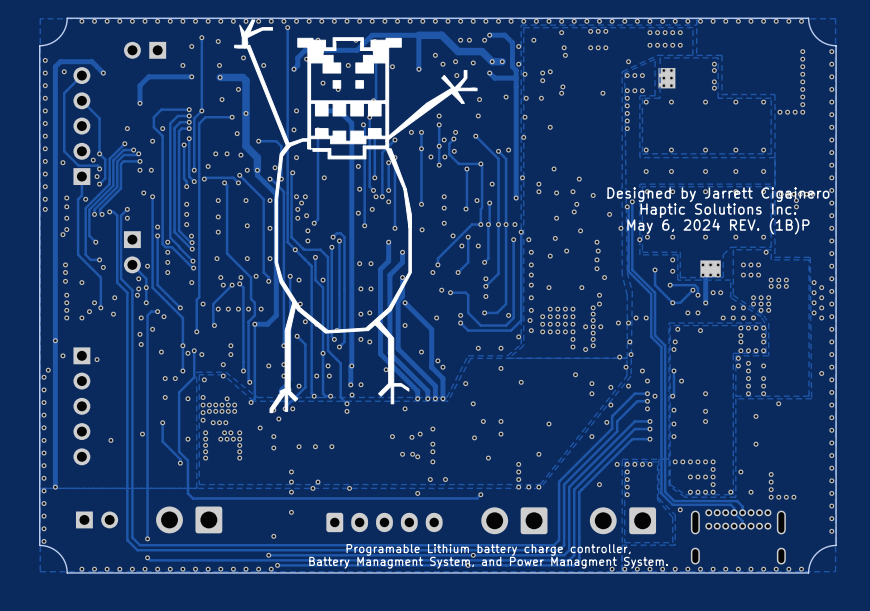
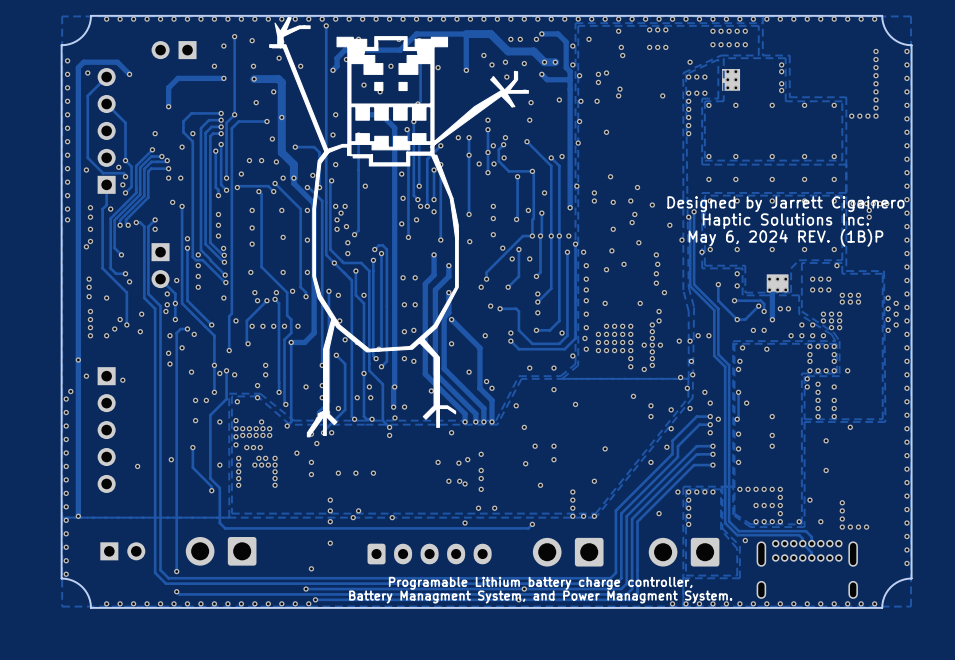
via: (821, 317) -> none
via: none -> (847, 370)
via: (821, 373) -> none

